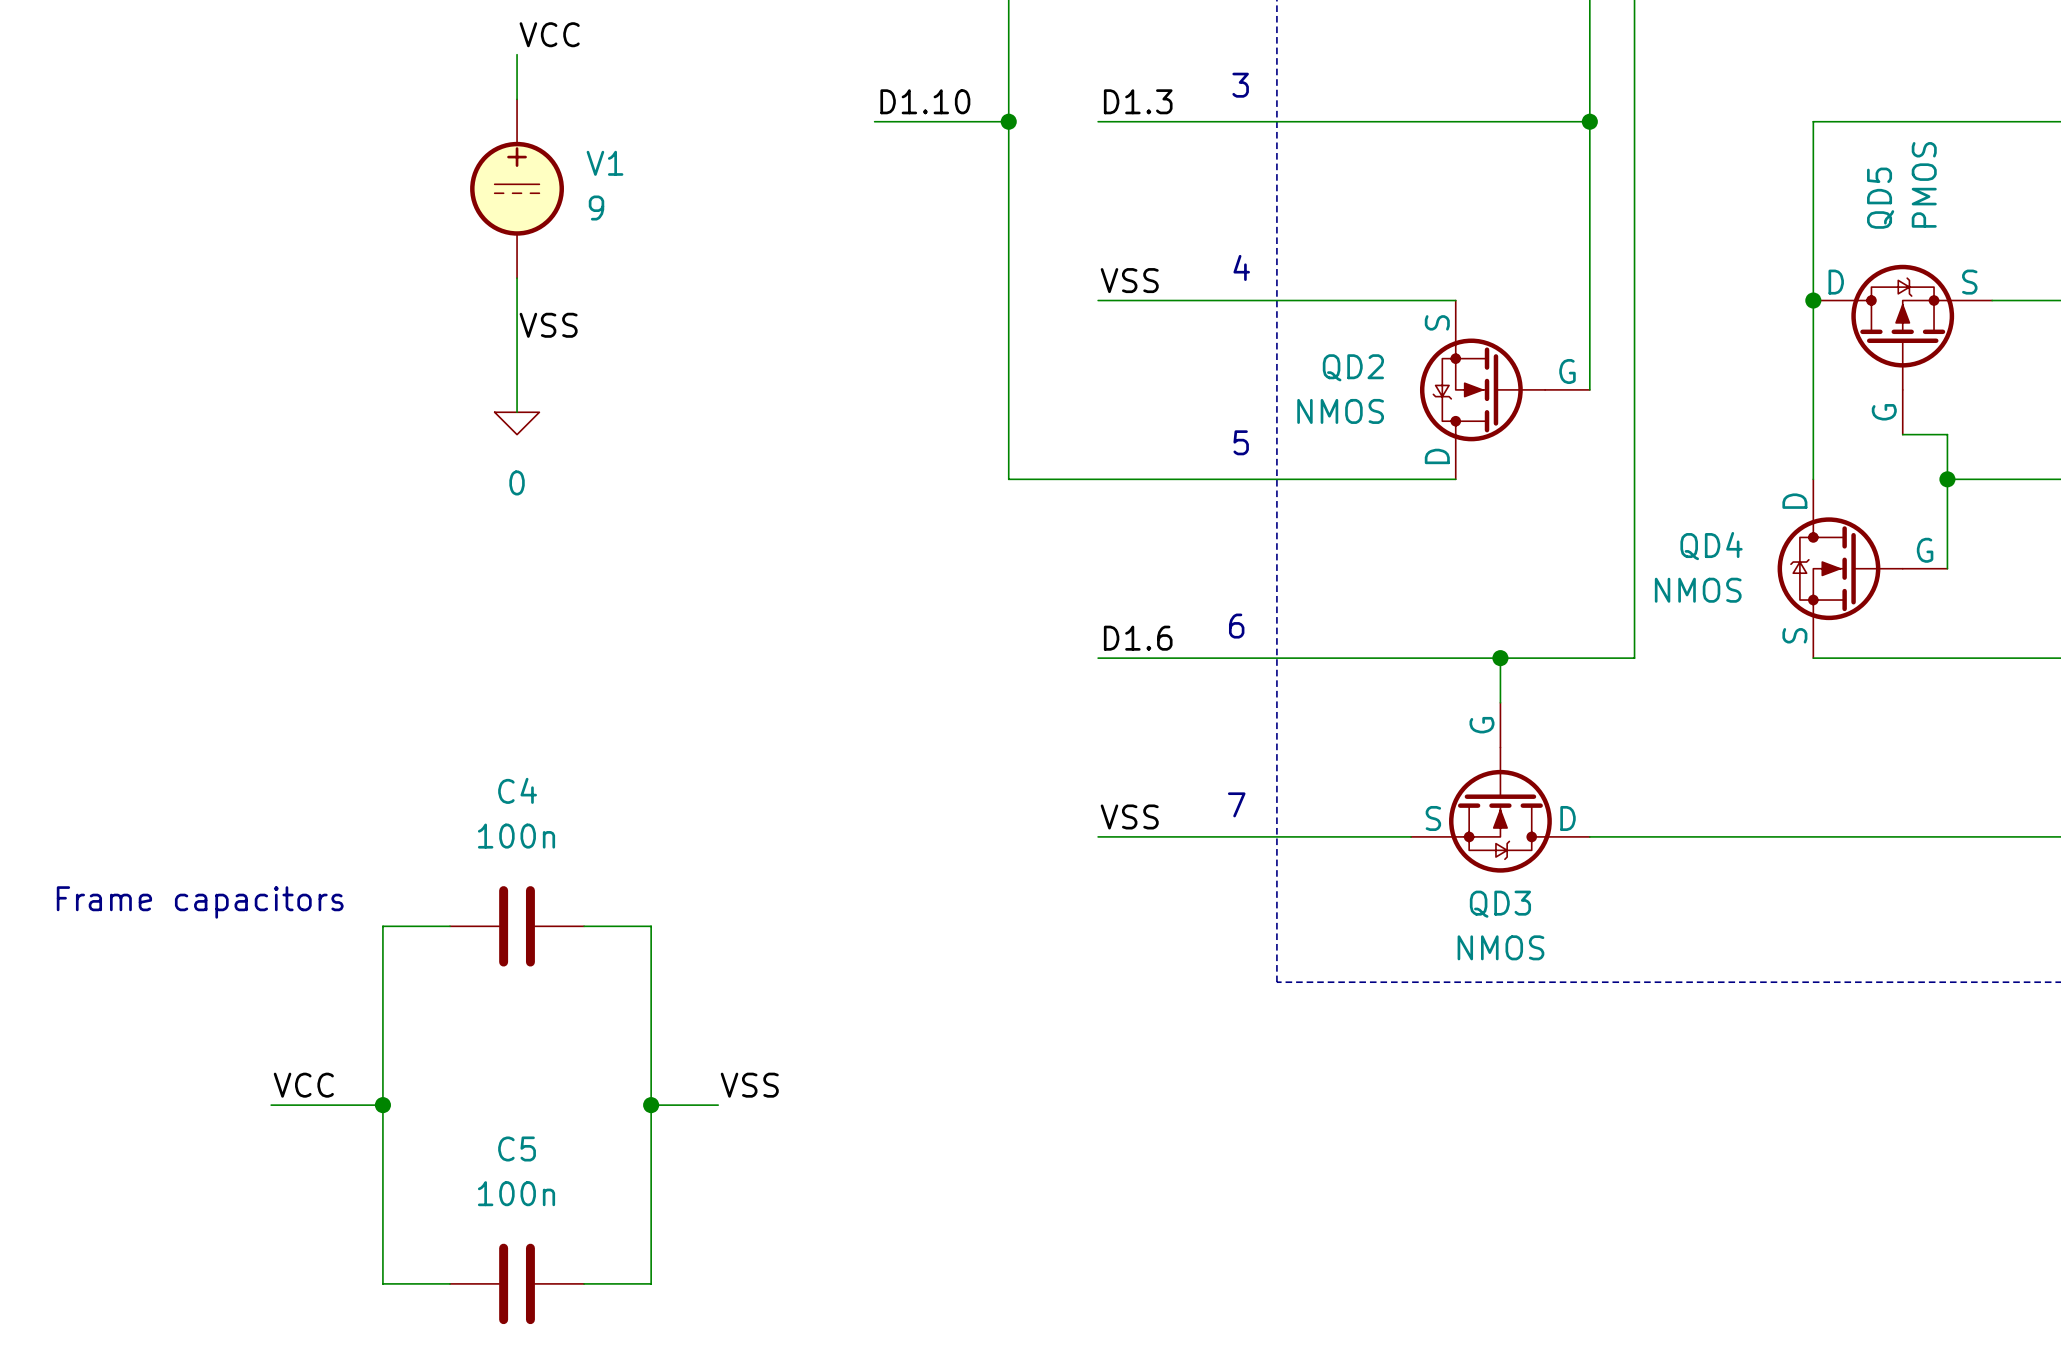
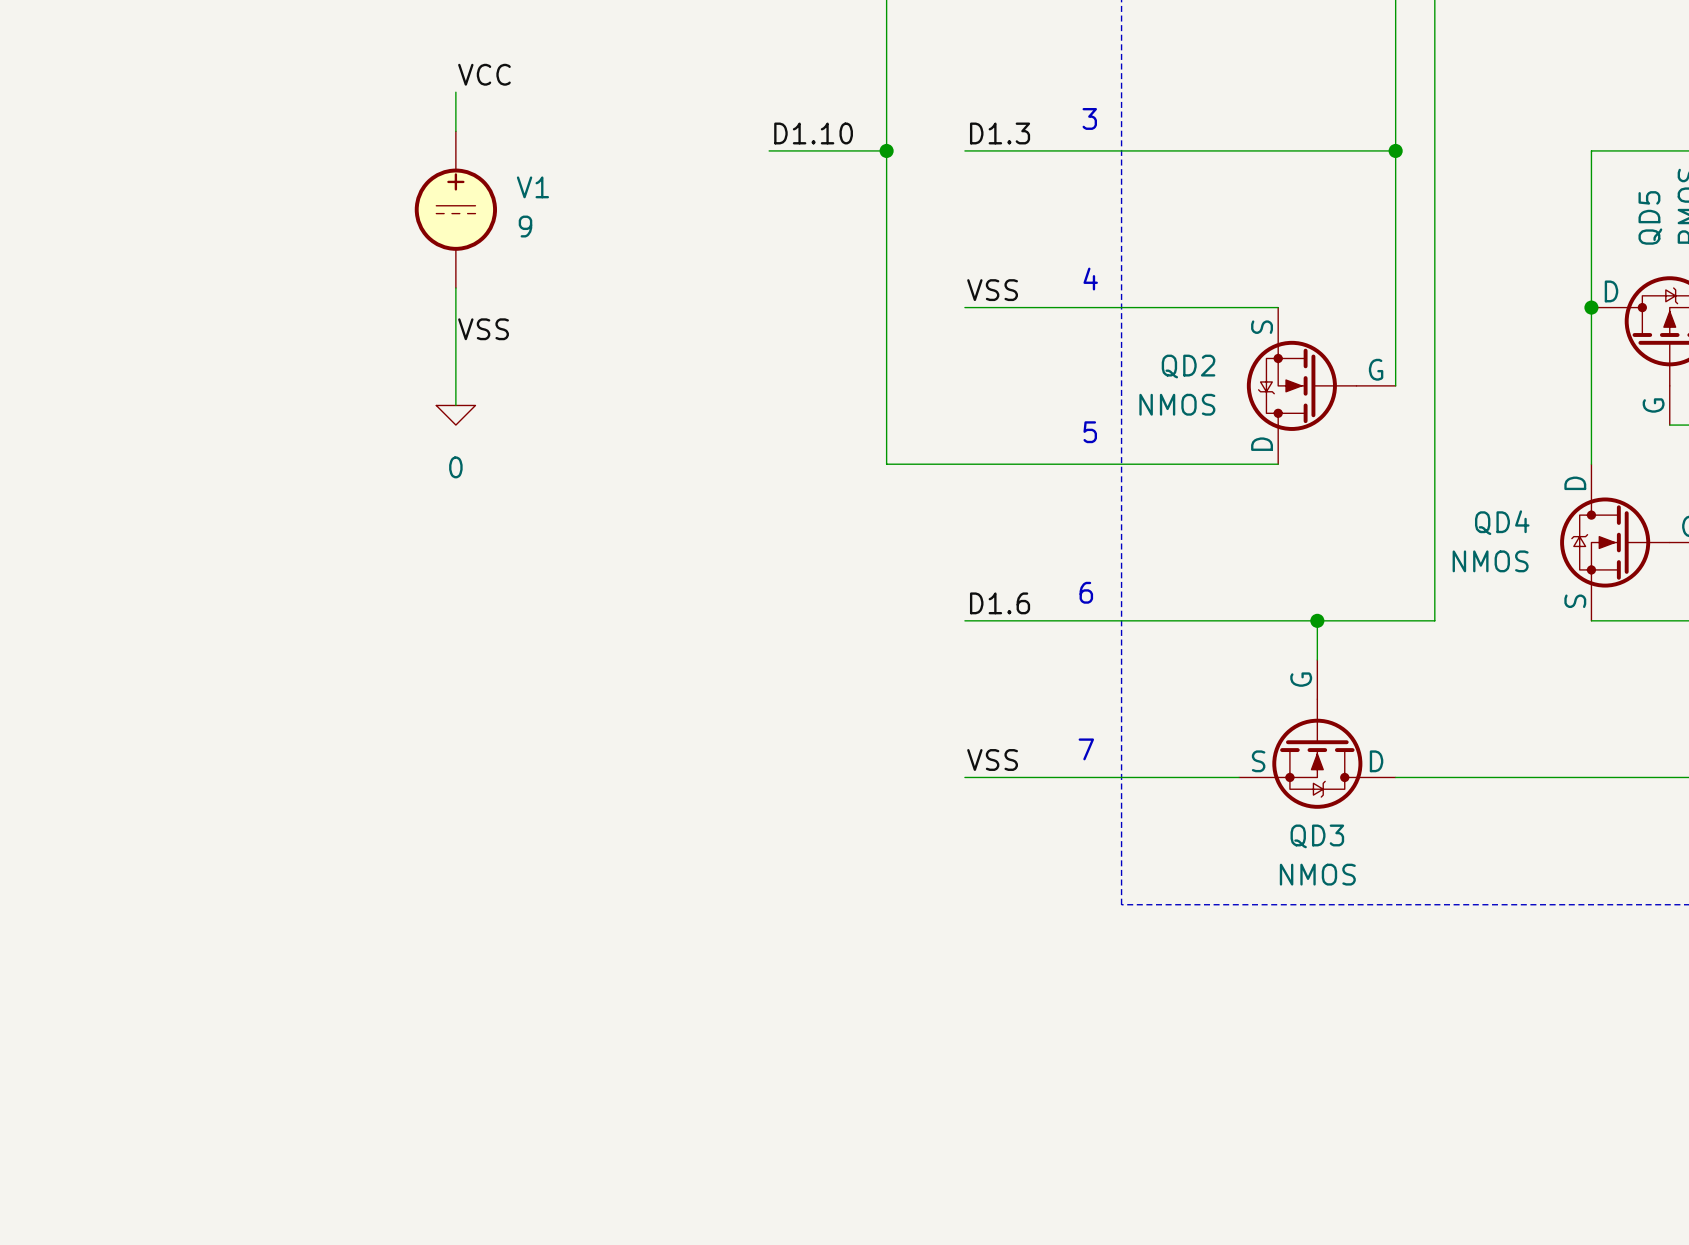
text: Frame capacitors (200, 902) -> none
wire: (449, 926) (382, 926) (382, 1283) (449, 1283) -> none
C4: 100n (517, 926) -> none
wire: (584, 926) (651, 926) (651, 1283) (584, 1283) -> none
label: VCC (303, 1085) -> none
label: VSS (749, 1085) -> none
wire: (271, 1105) (382, 1105) -> none
junction: (382, 1105) -> none
wire: (651, 1105) (718, 1105) -> none
junction: (651, 1105) -> none
C5: 100n (517, 1283) -> none

